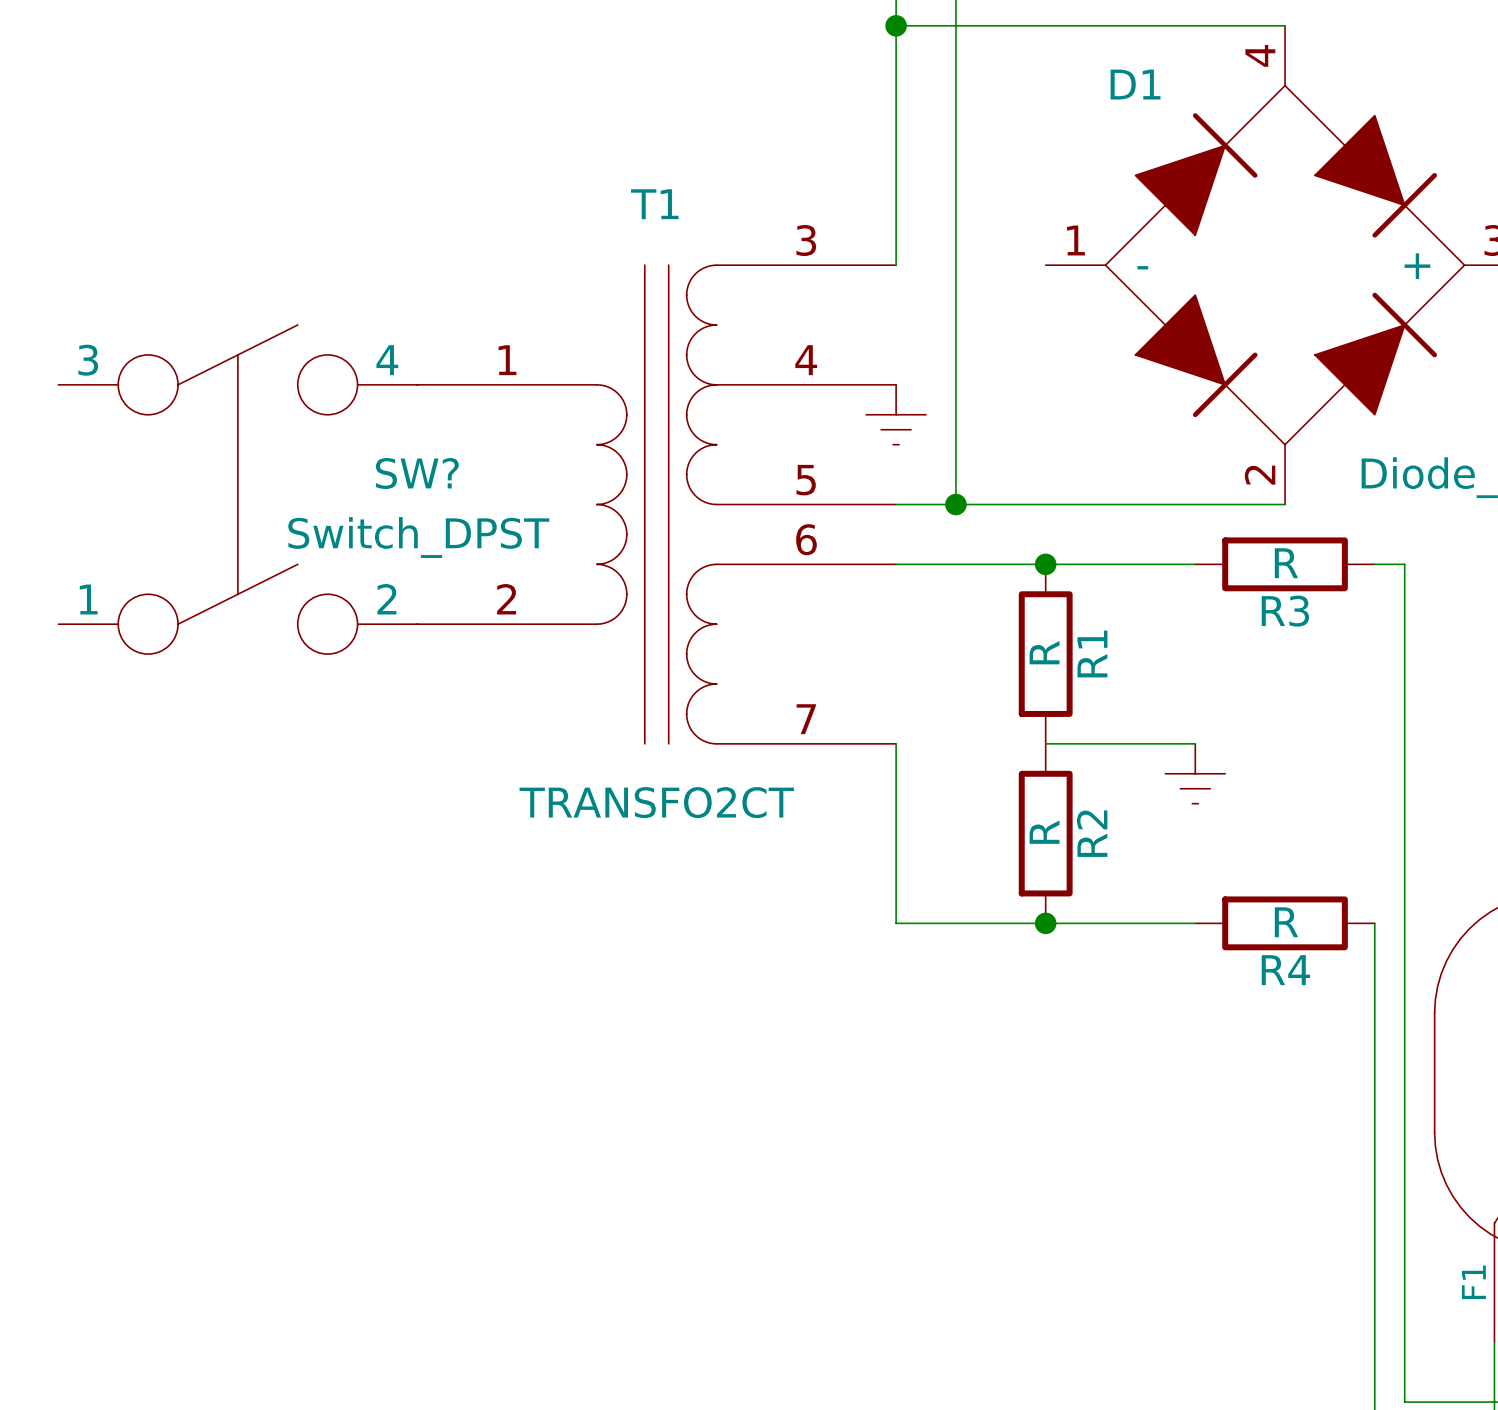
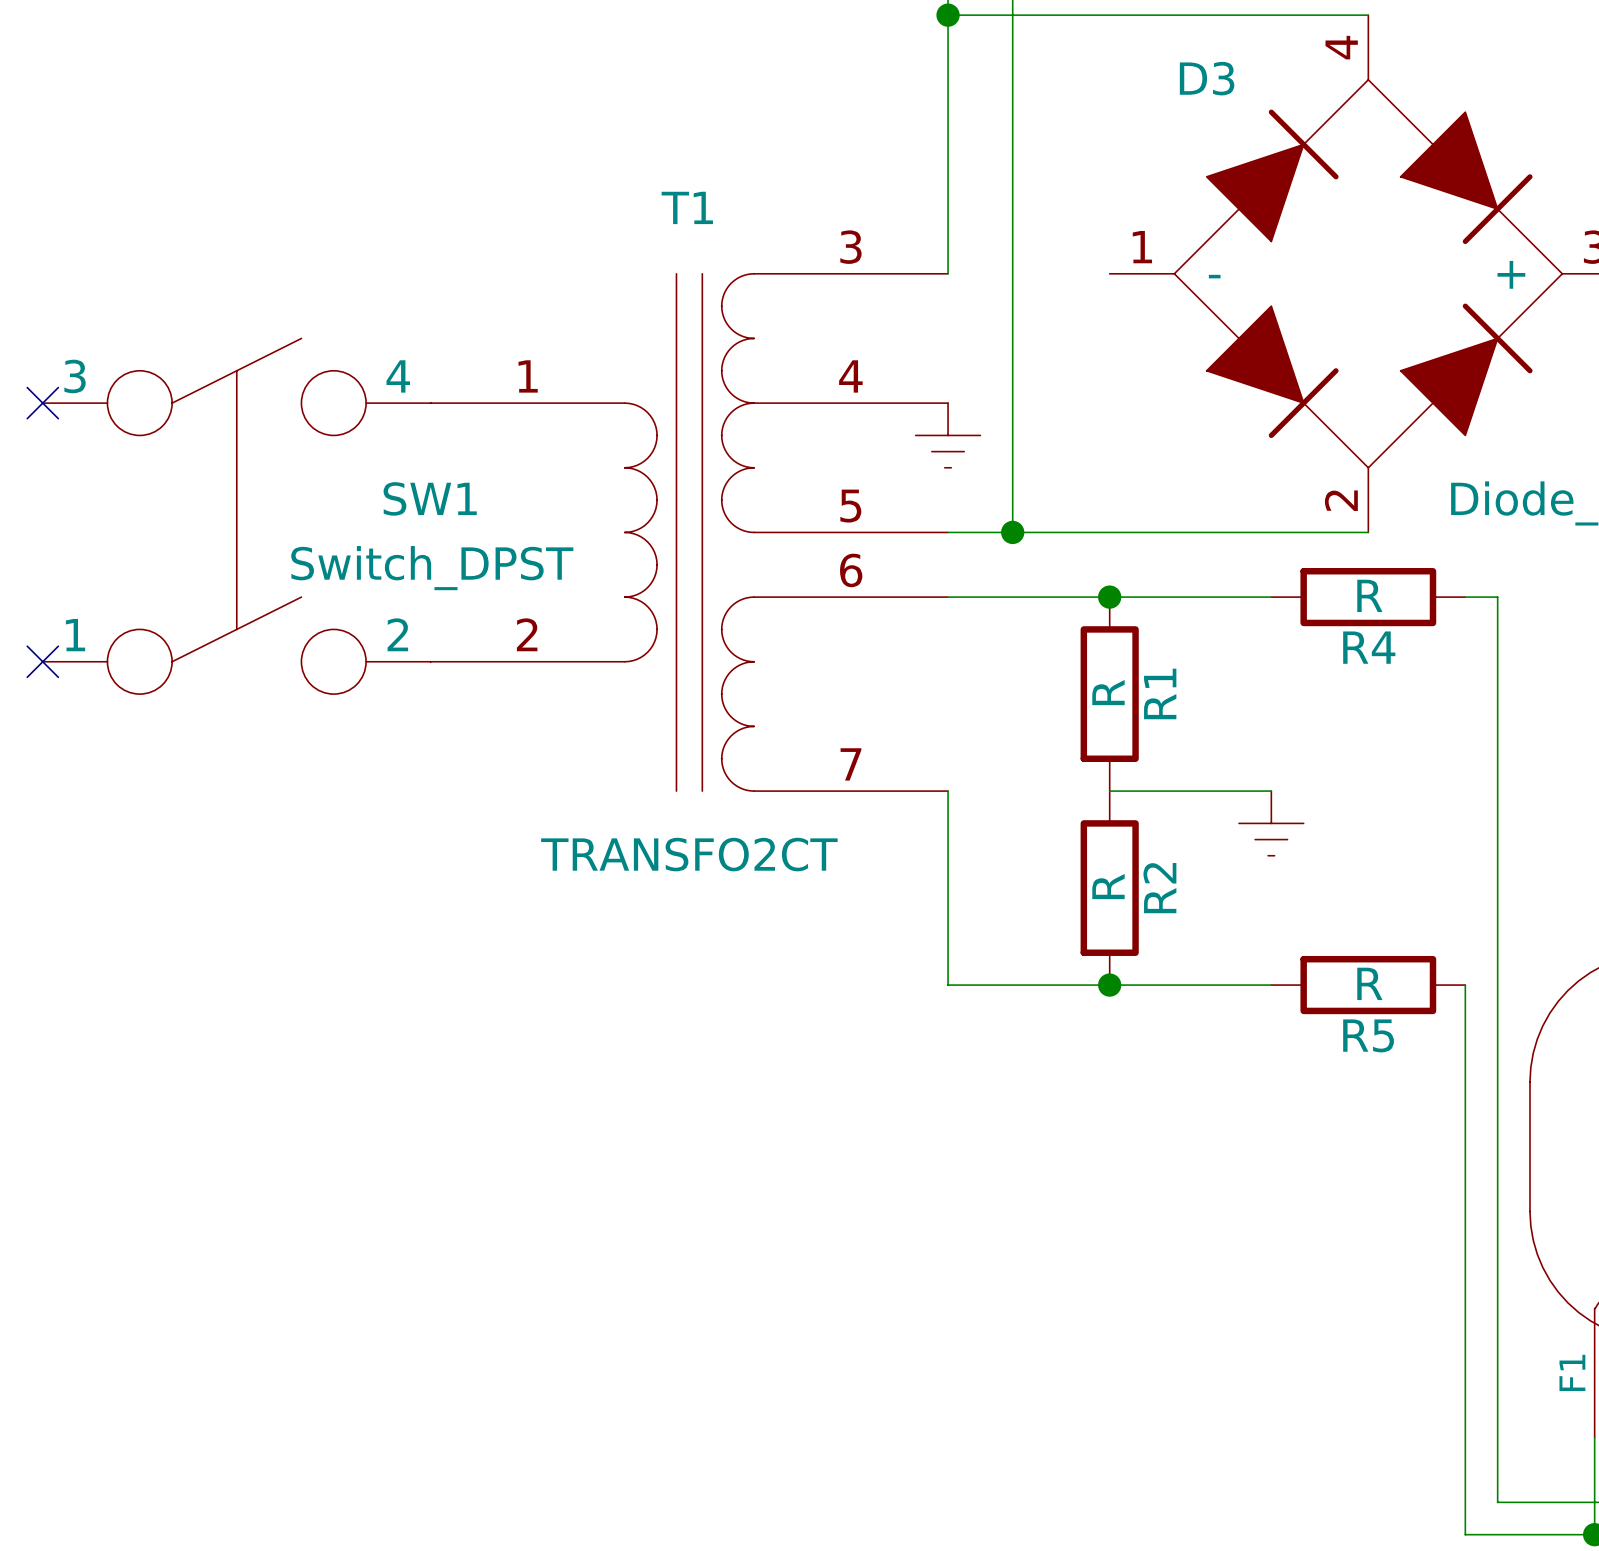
D1 name: D1 (1135, 84) -> D3 (1207, 78)
no-connect mark: none -> (42, 403)
SW? name: SW? (417, 473) -> SW1 (430, 498)
R3 name: R3 (1285, 611) -> R4 (1369, 647)
no-connect mark: none -> (42, 661)
R4 name: R4 (1285, 970) -> R5 (1368, 1035)

